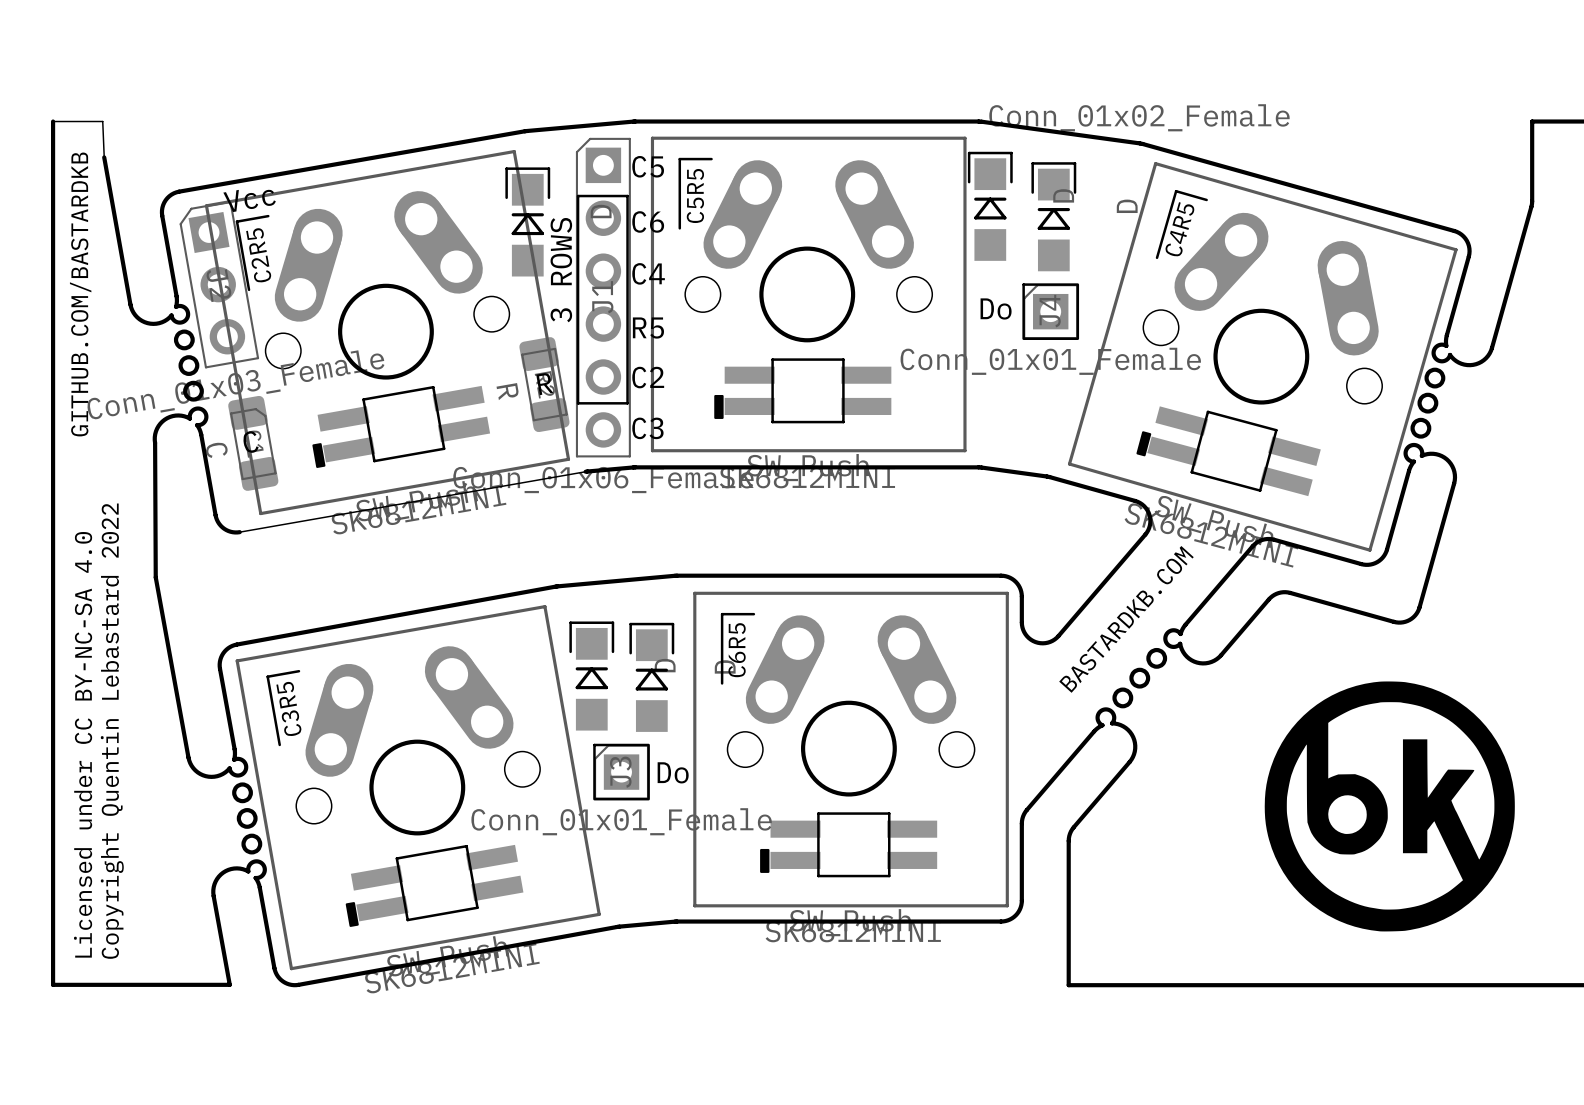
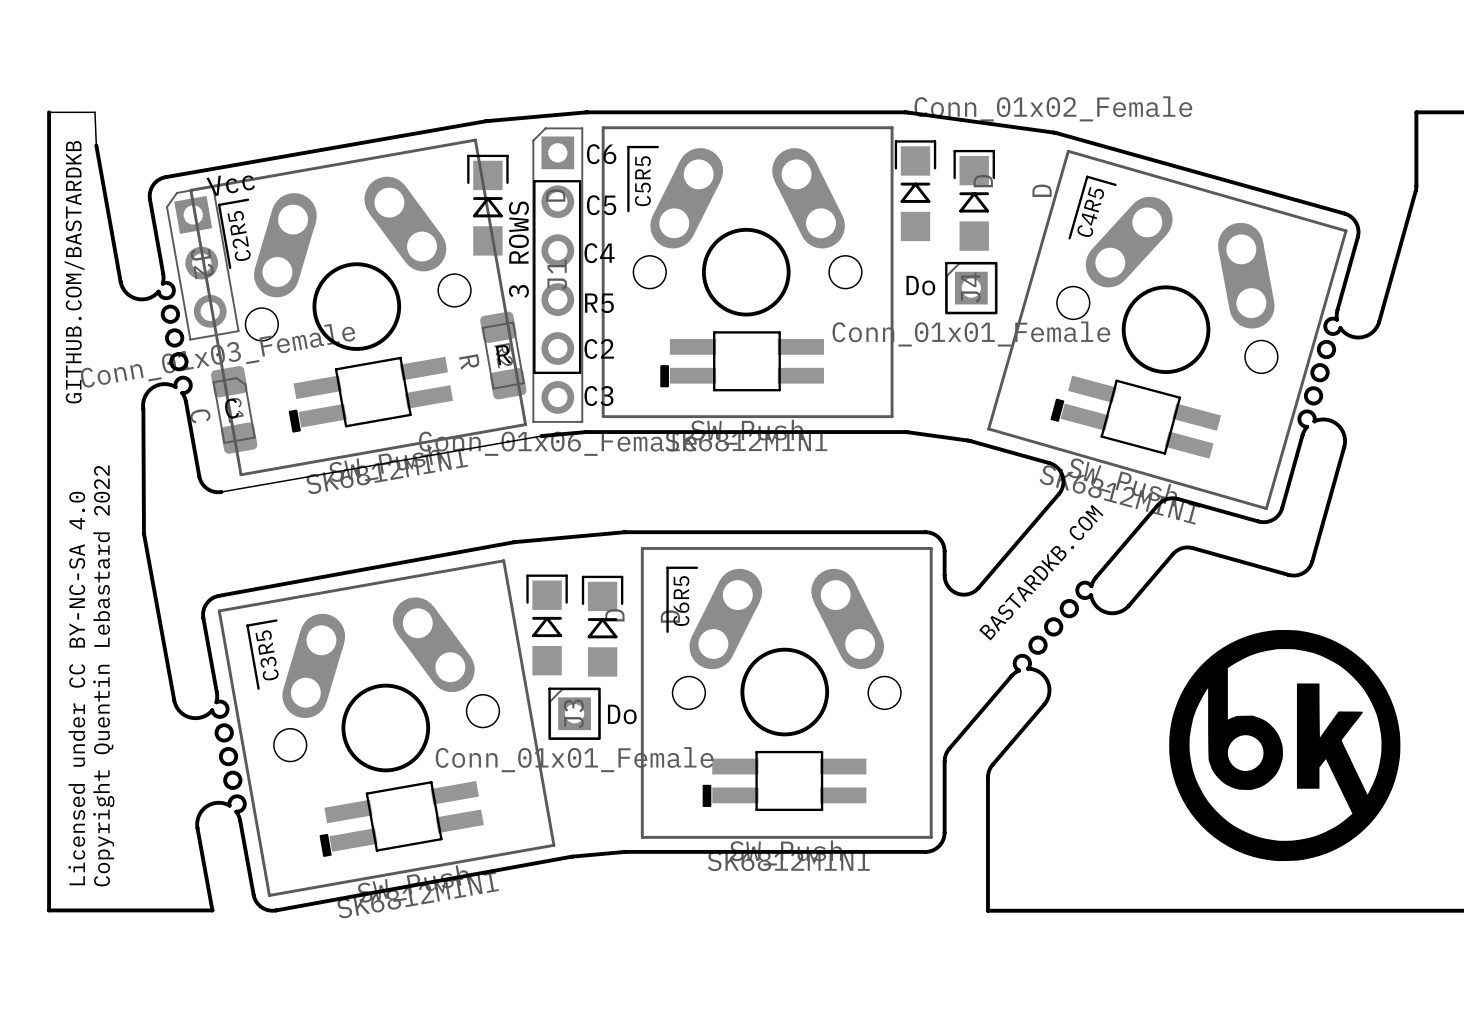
text: C5 (648, 166) -> C6 (601, 154)
text: C6 (648, 221) -> C5 (601, 205)

